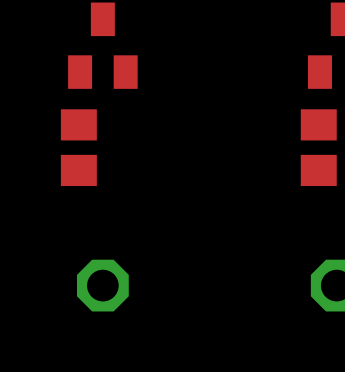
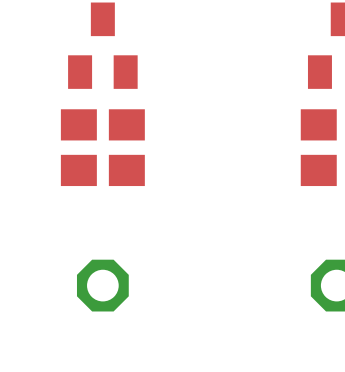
part: none -> (126, 147)

